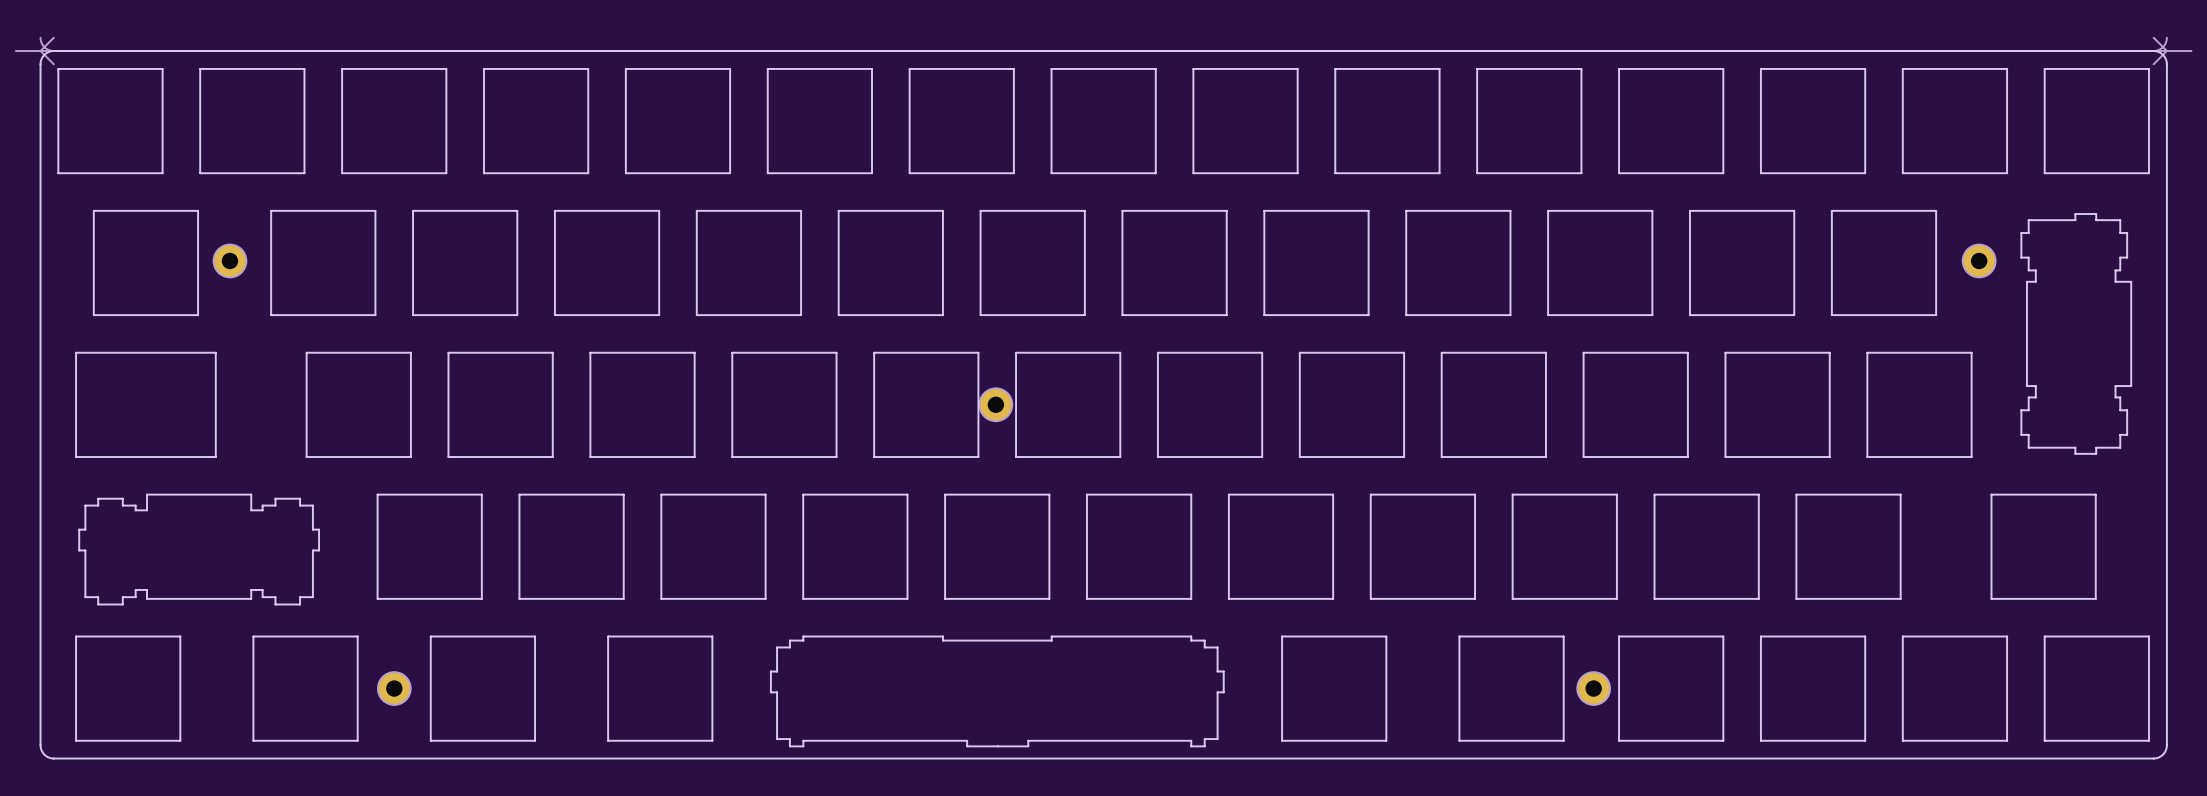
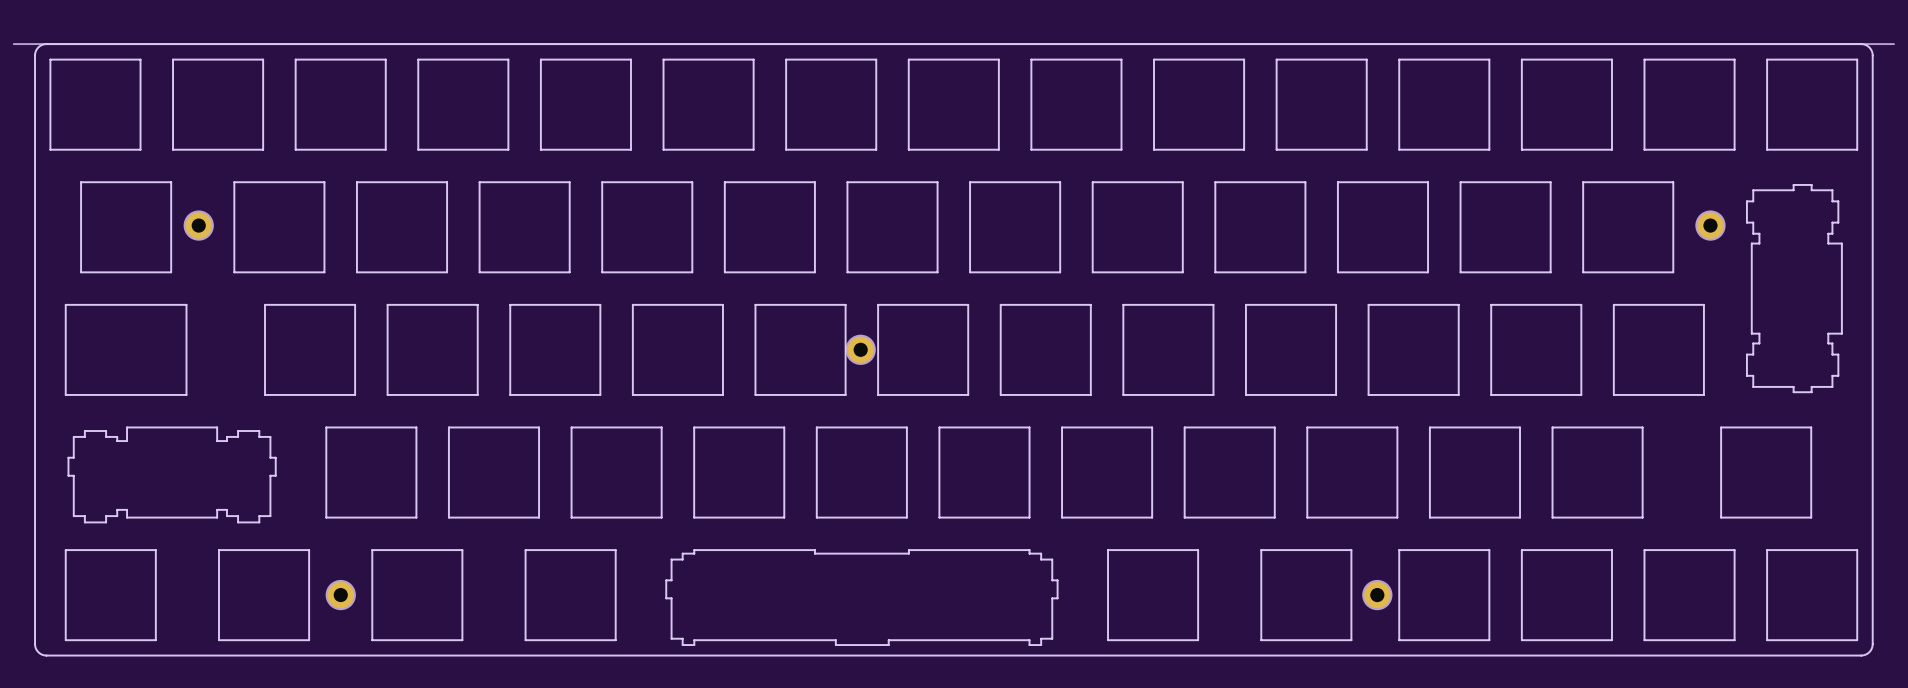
line: (40, 37) (44, 47) (53, 51) -> none
line: (53, 37) (40, 51) (53, 64) -> none
line: (2153, 37) (2166, 51) (2153, 64) -> none
line: (2166, 37) (2163, 47) (2153, 51) -> none

